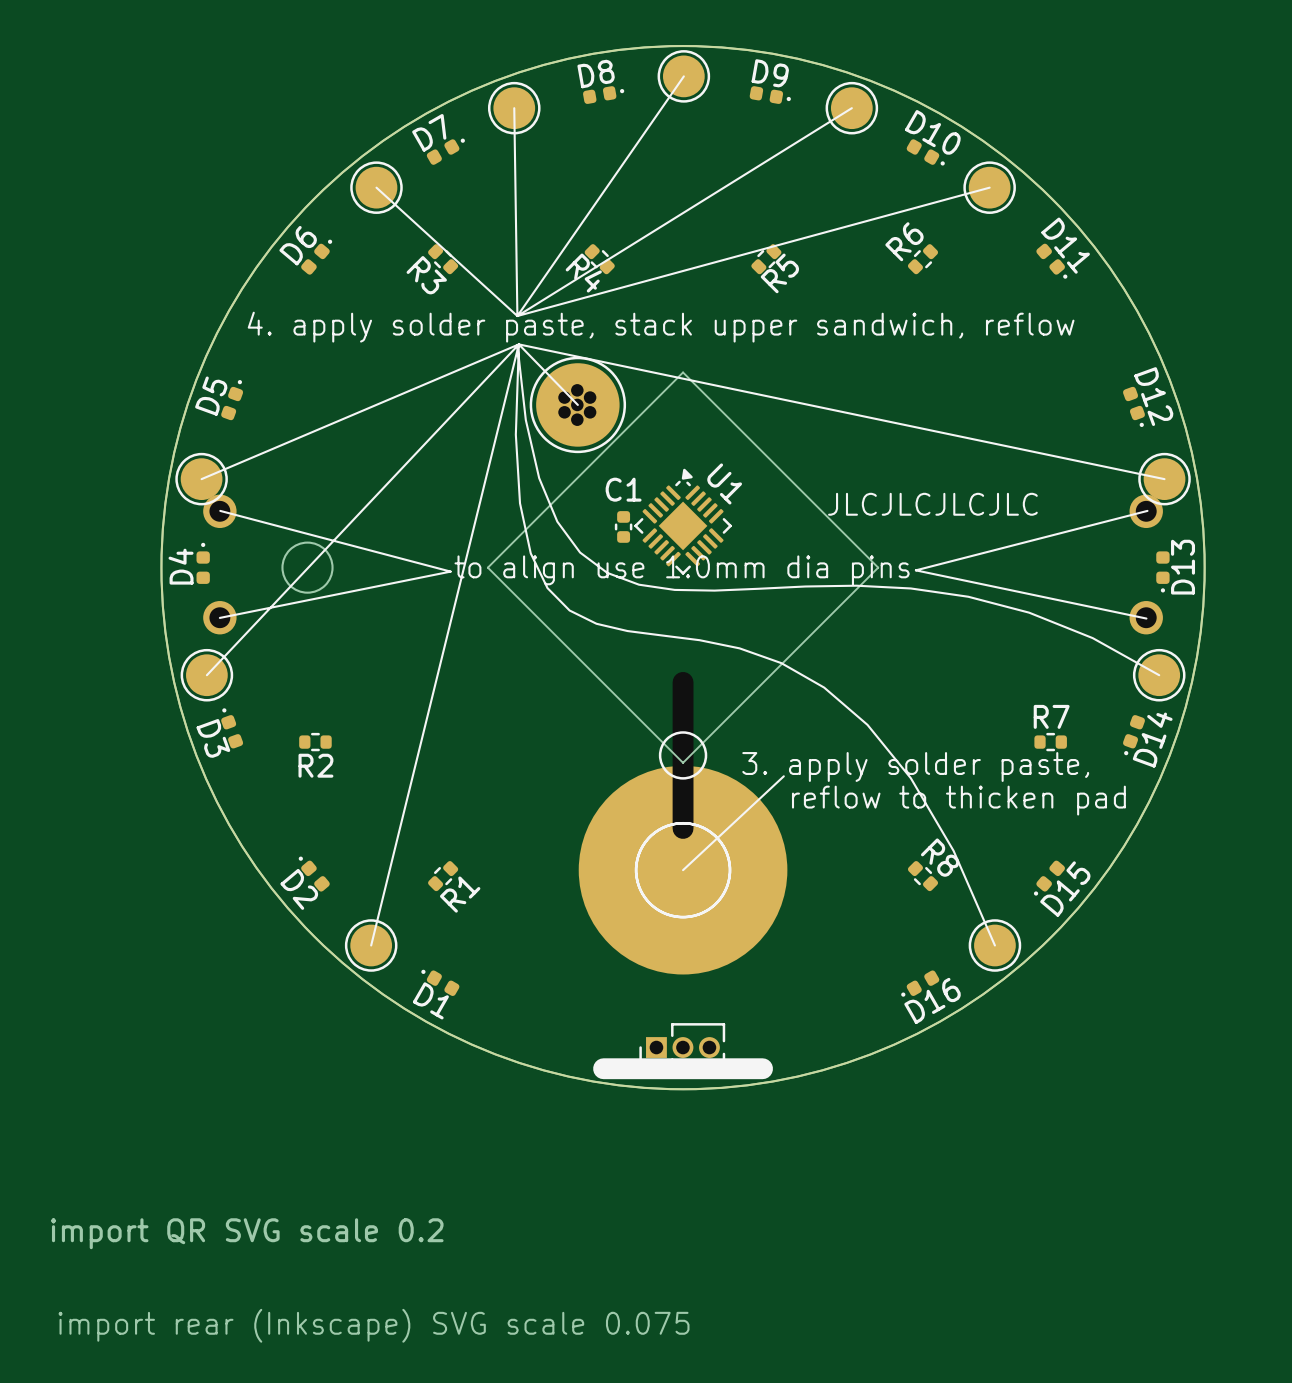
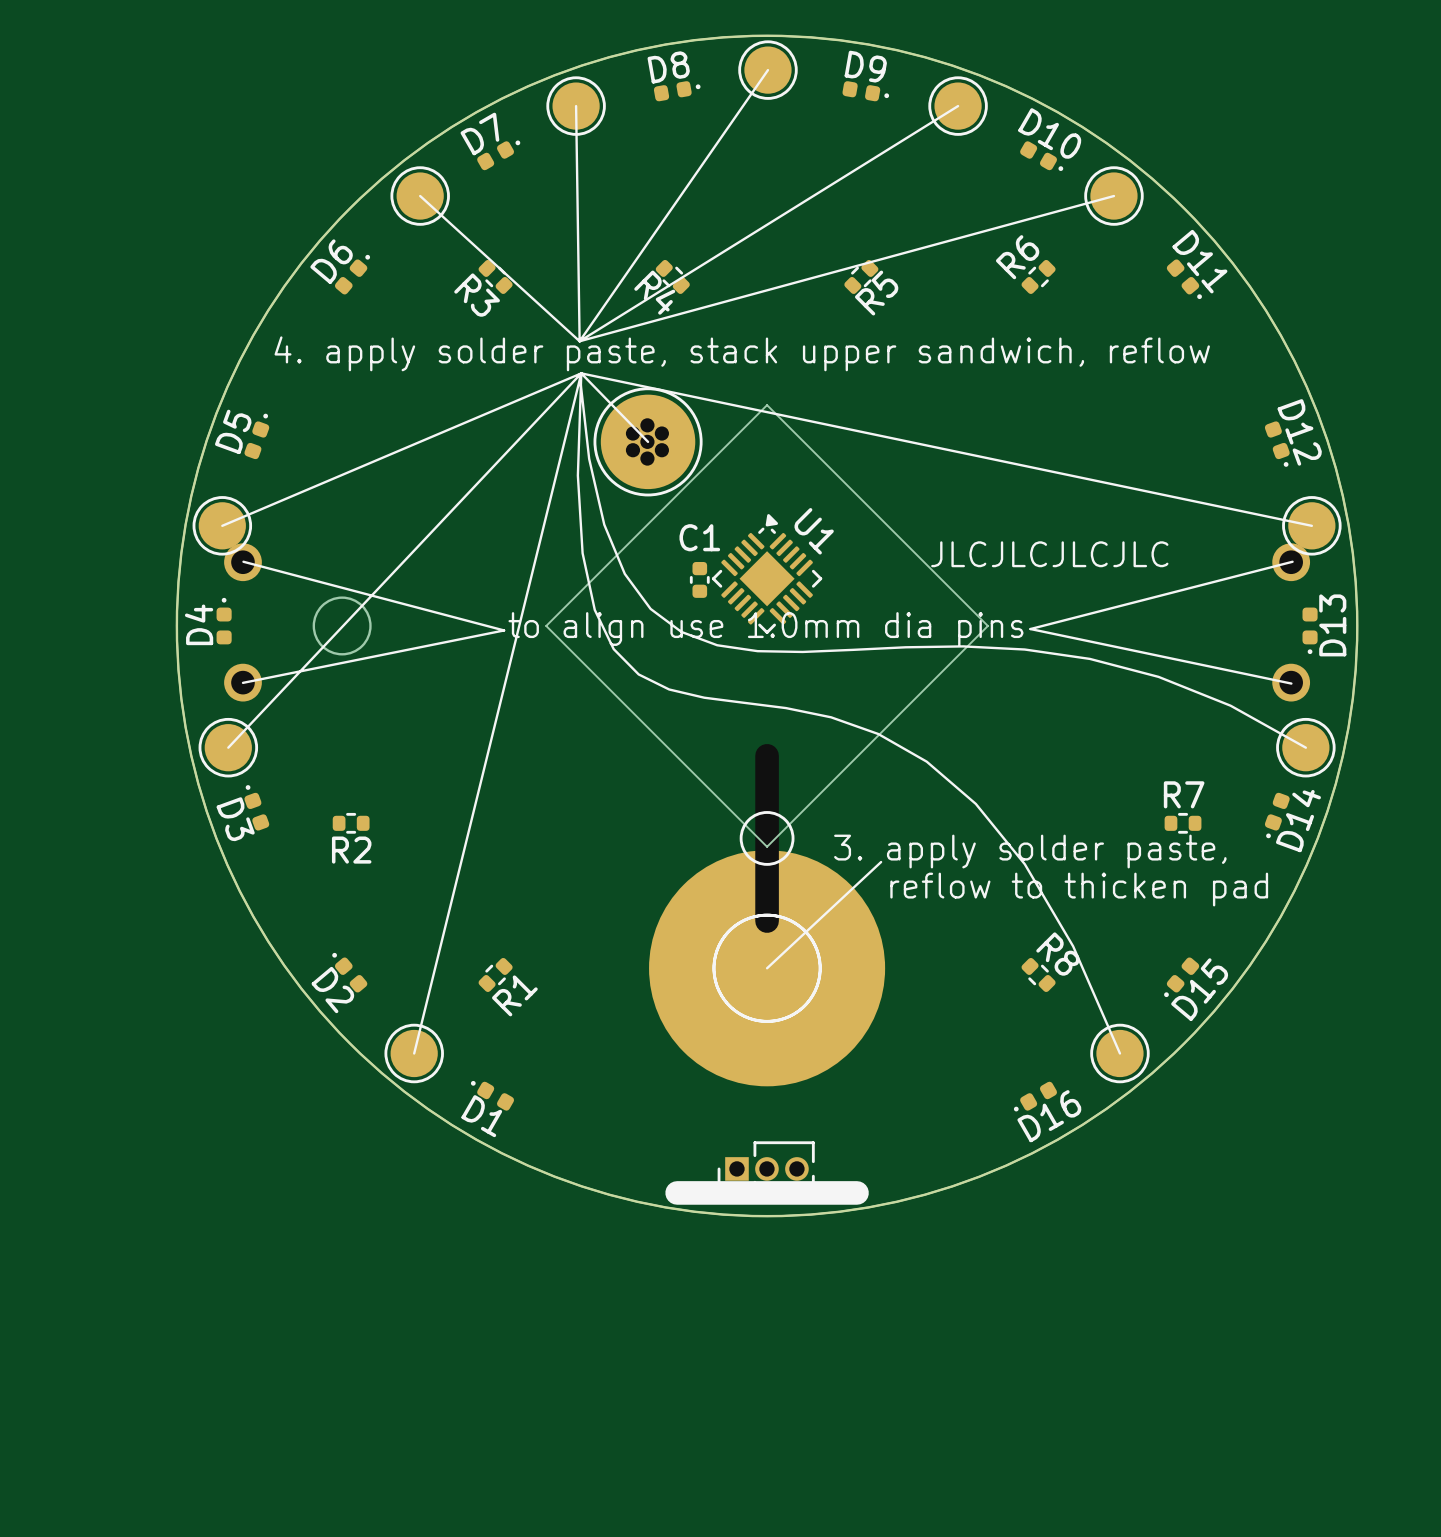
text: import QR SVG scale 0.2 (247, 1233) -> none
text: import rear (Inkscape) SVG scale 0.075 (374, 1325) -> none

